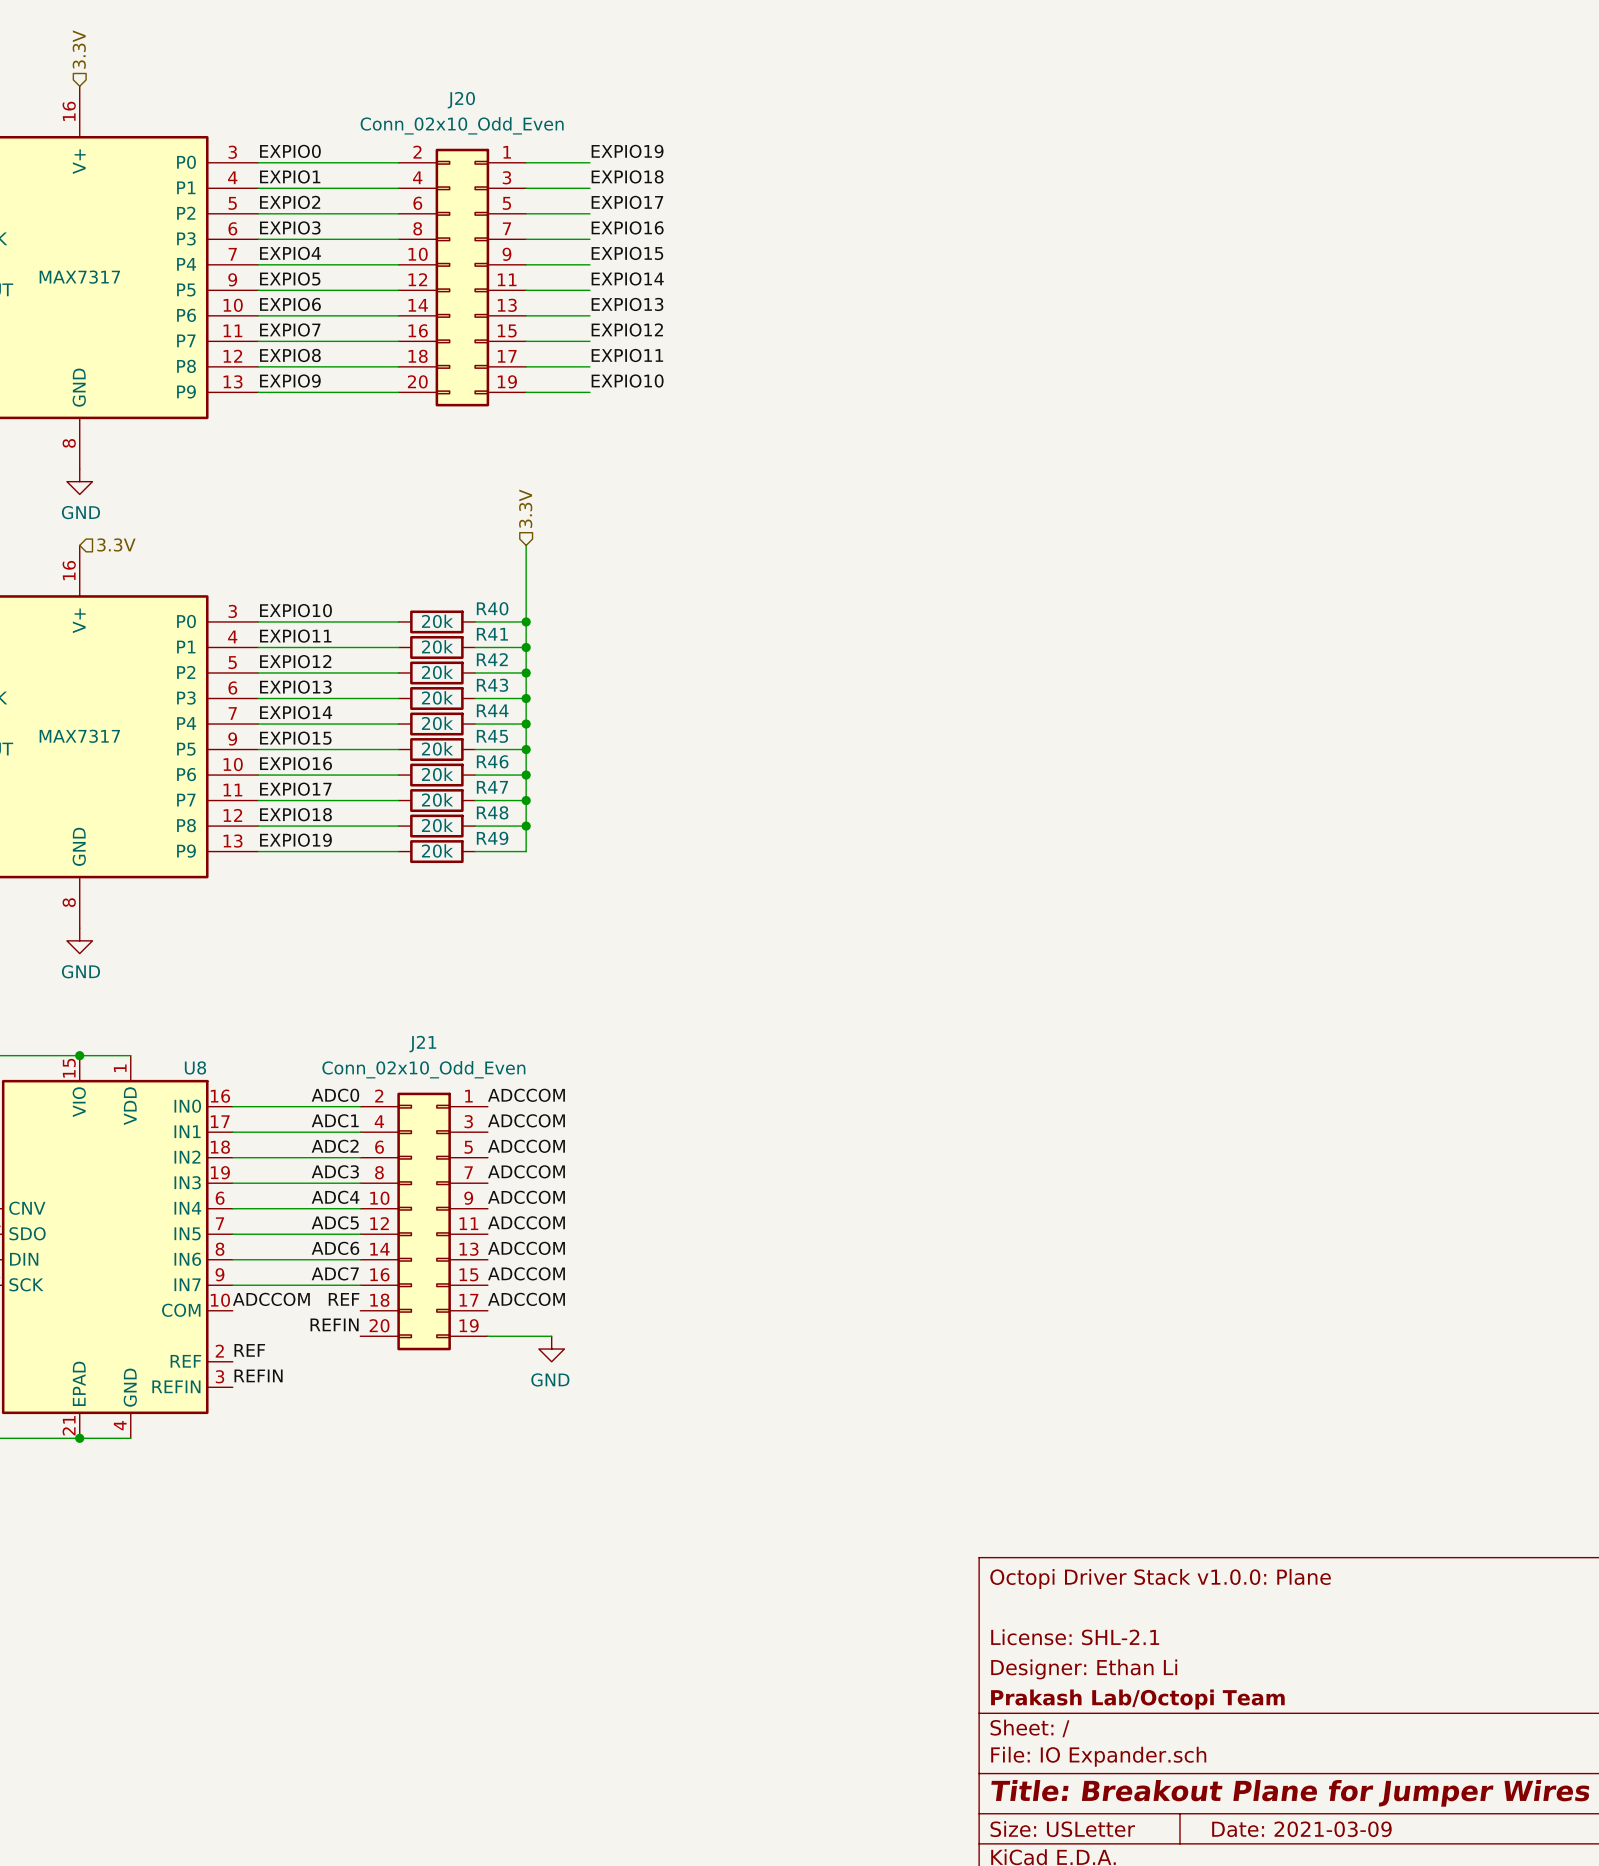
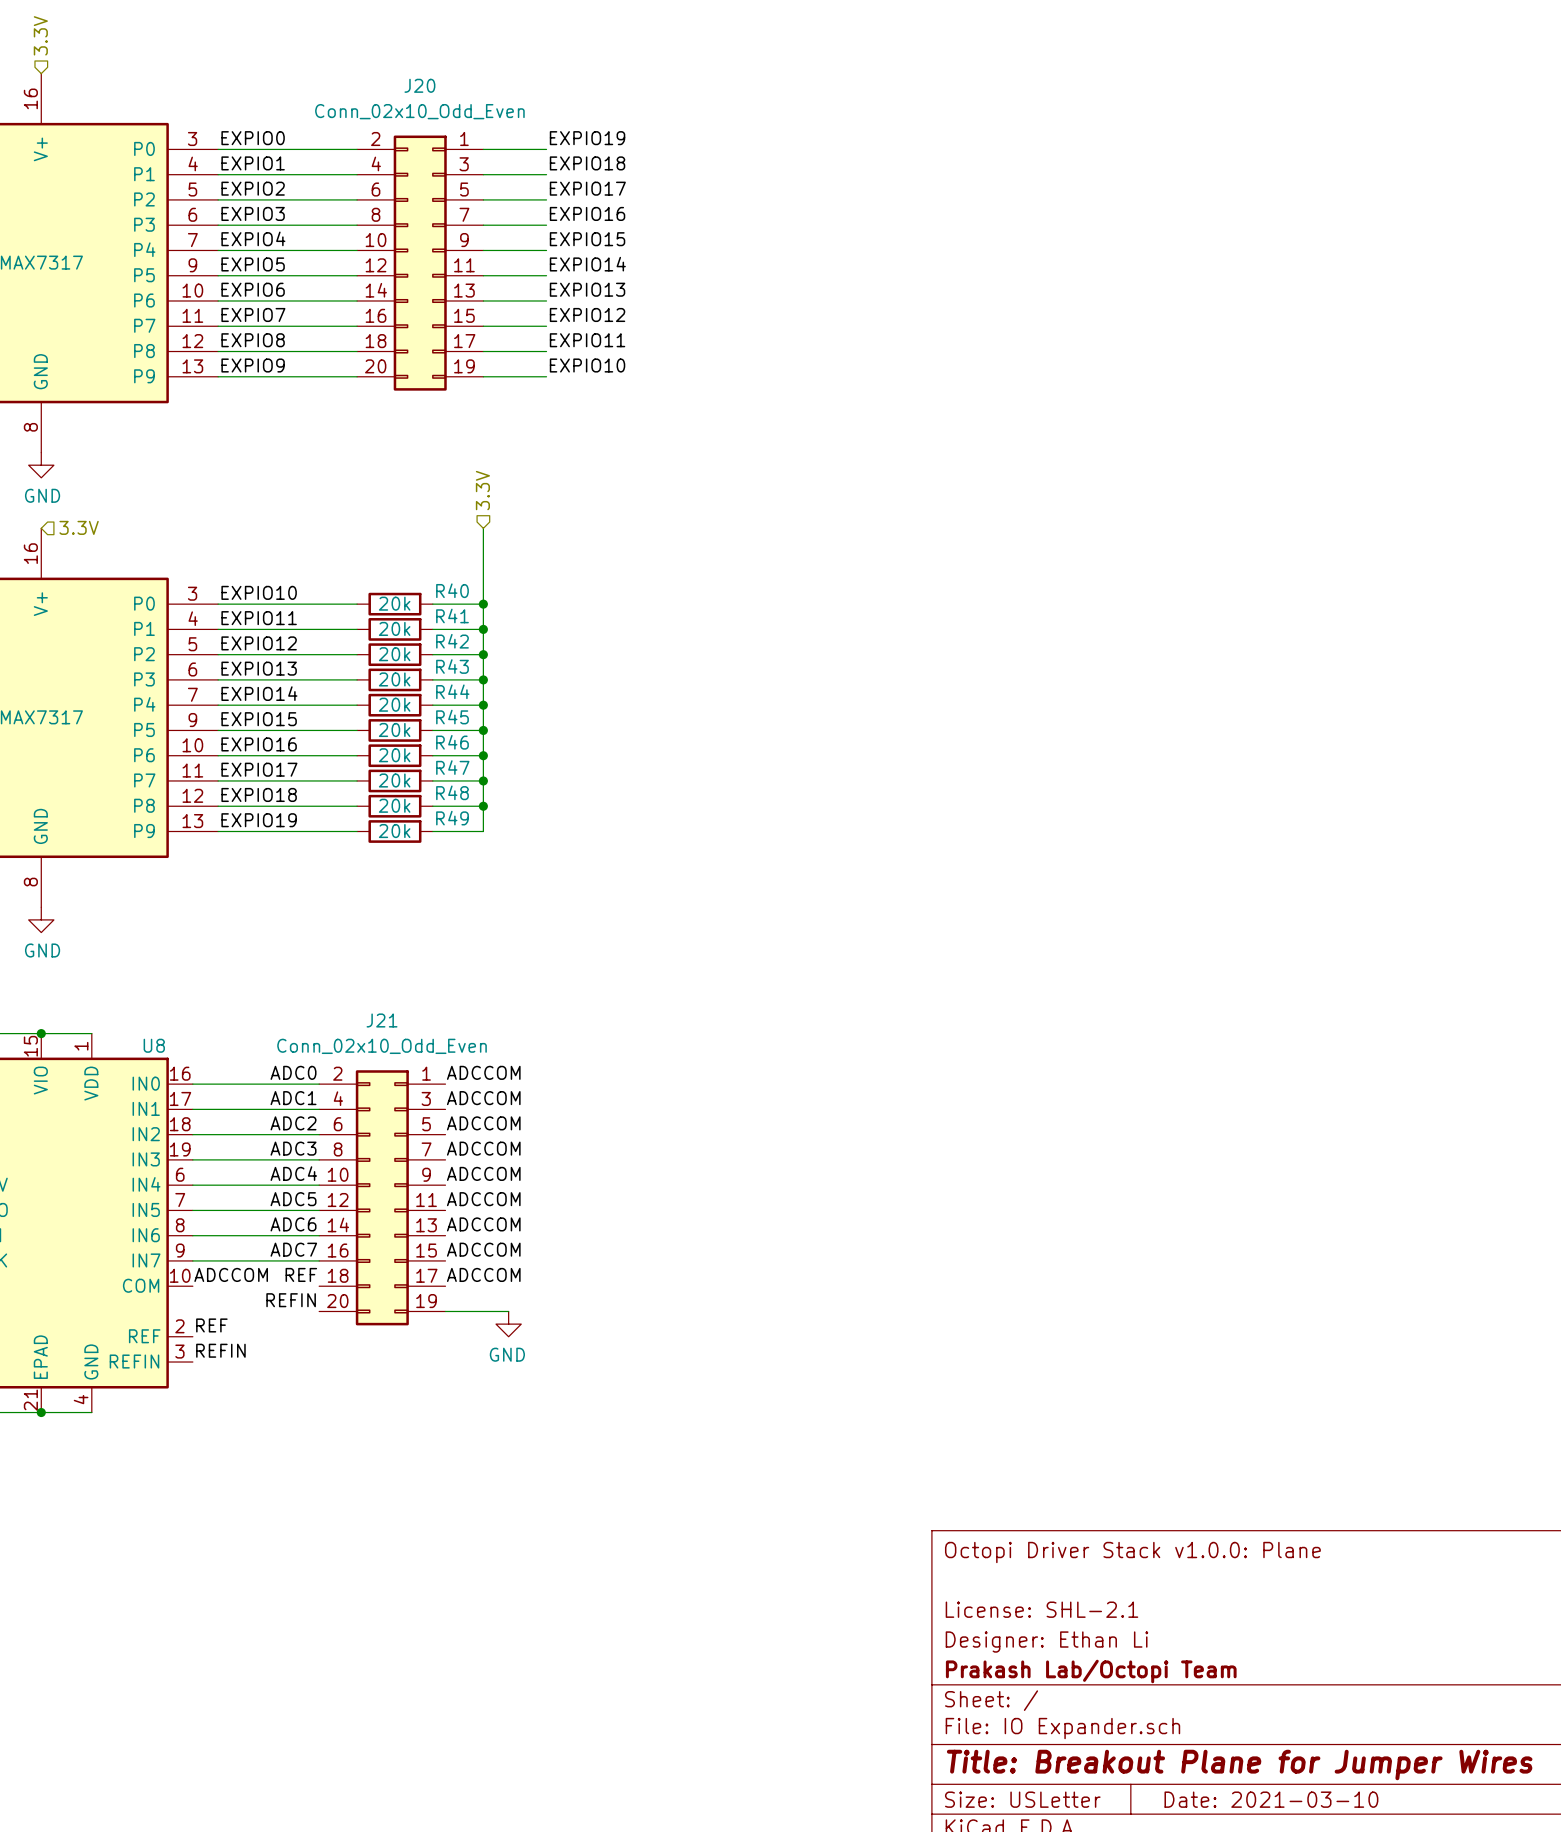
title block: Date: 2021-03-09 (1301, 1829) -> Date: 2021-03-10 (1271, 1799)

